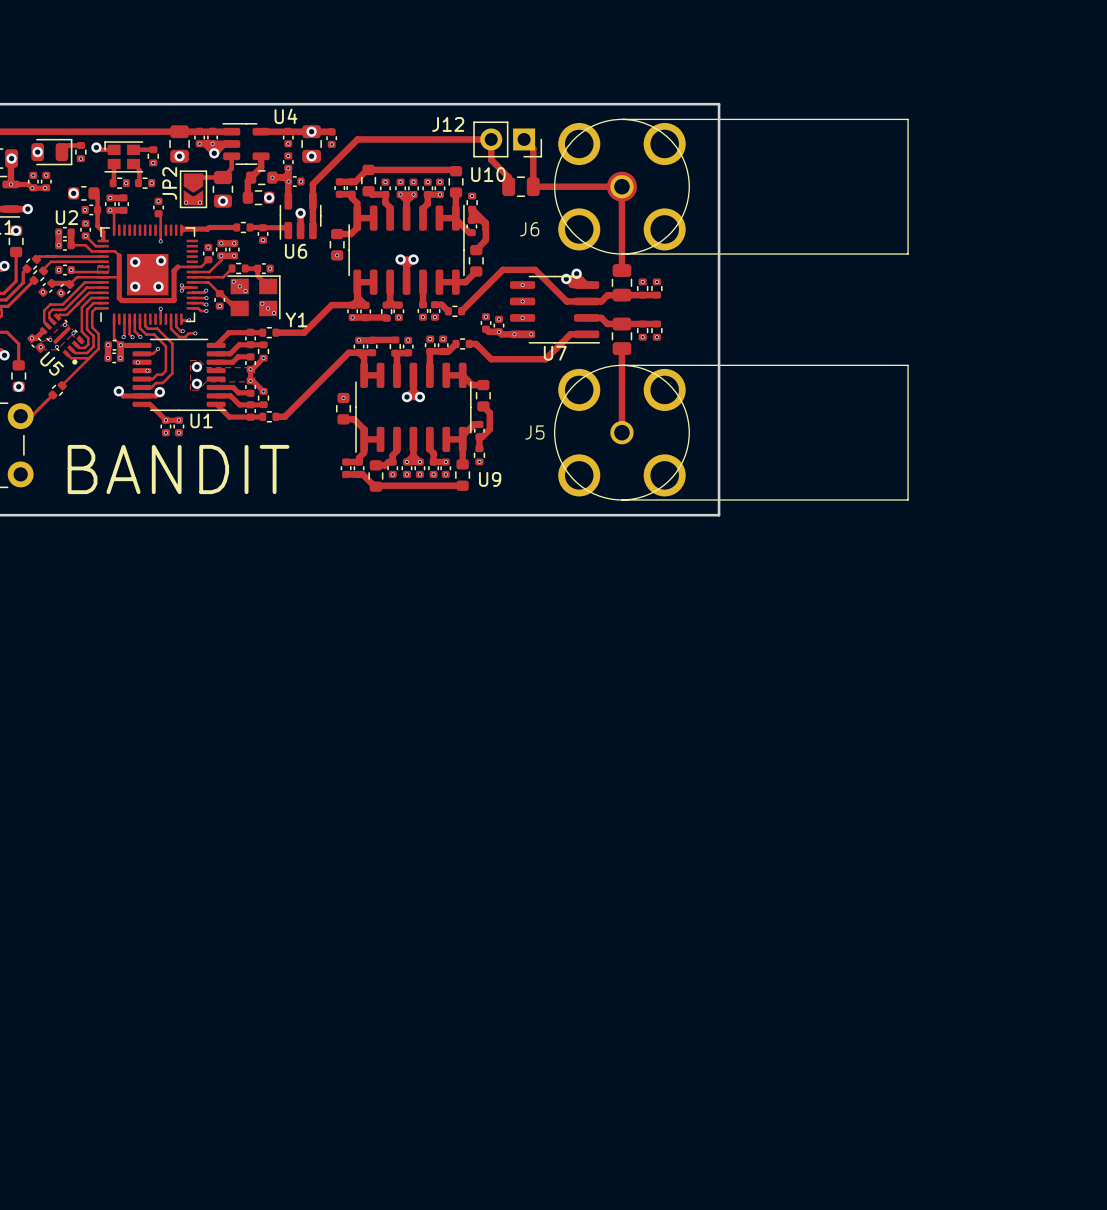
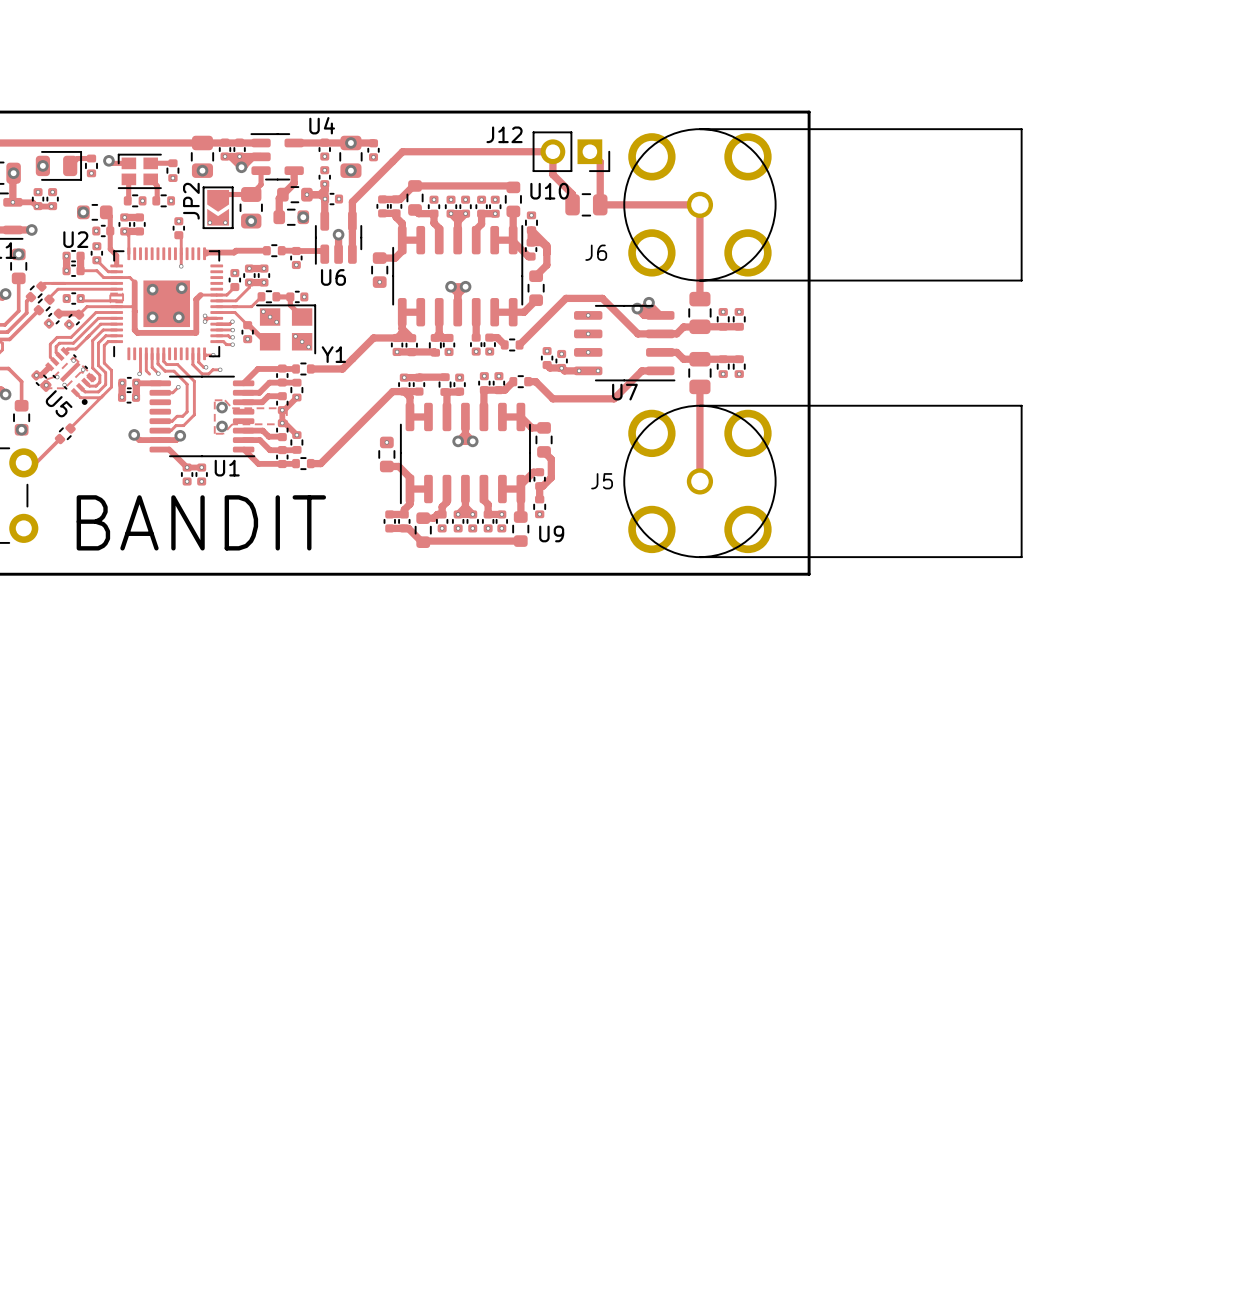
drawing: [606, 171, 637, 202] -> none
track: (160, 308) (160, 319) -> none
via: (160, 308) -> none
track: (114, 319) (114, 338) (120, 345) -> none
via: (132, 337) -> none
via: (137, 362) -> none
via: (147, 370) -> none

